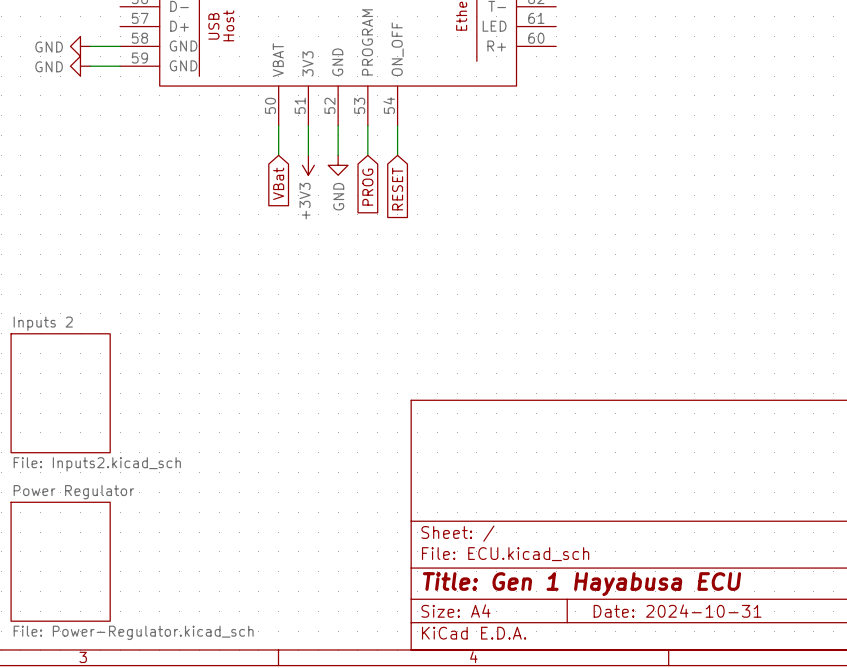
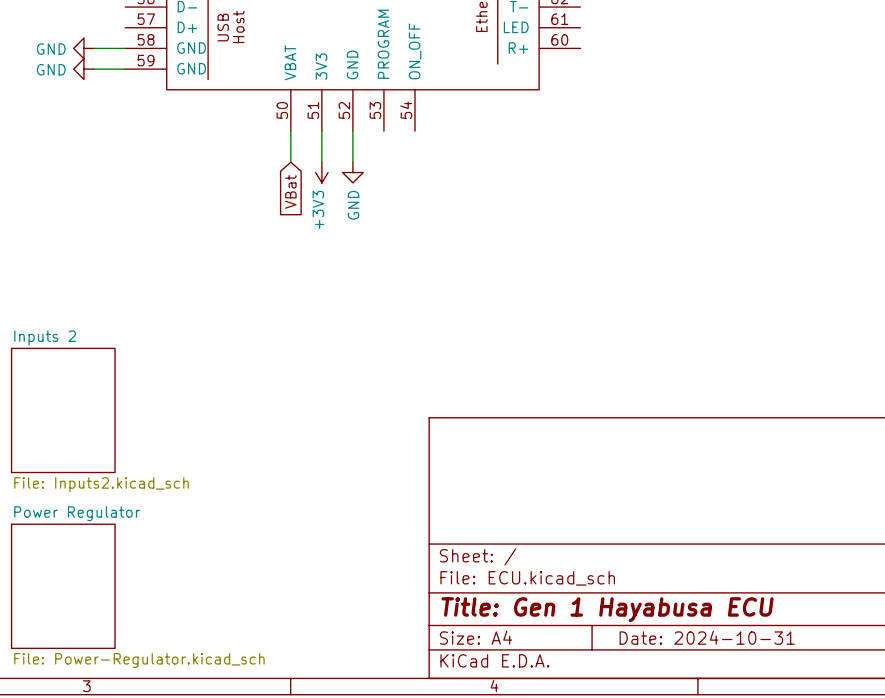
wire: (367, 125) (367, 155) -> none
wire: (397, 125) (397, 155) -> none
global label: PROG (367, 187) -> none
global label: RESET (397, 189) -> none

